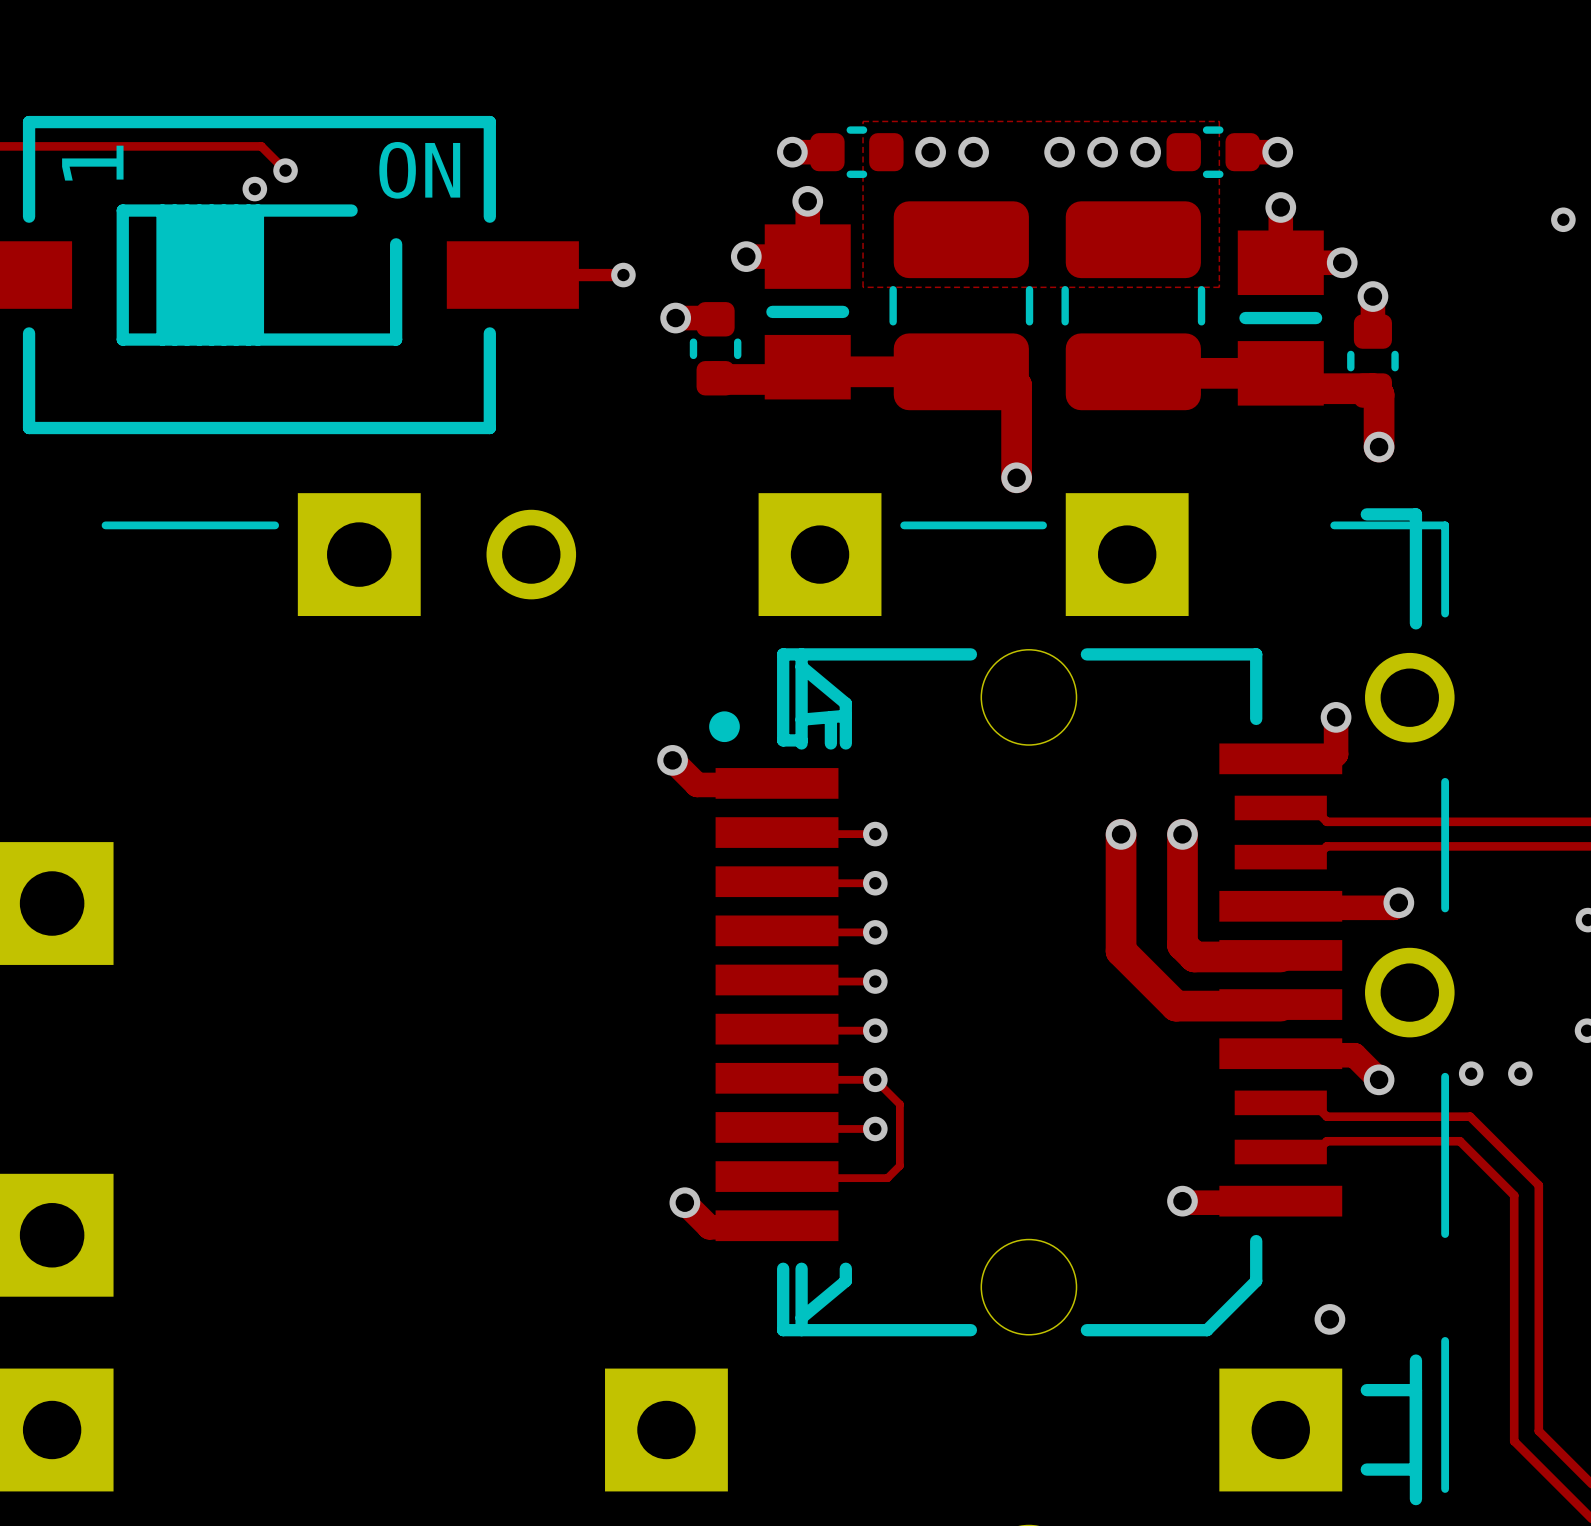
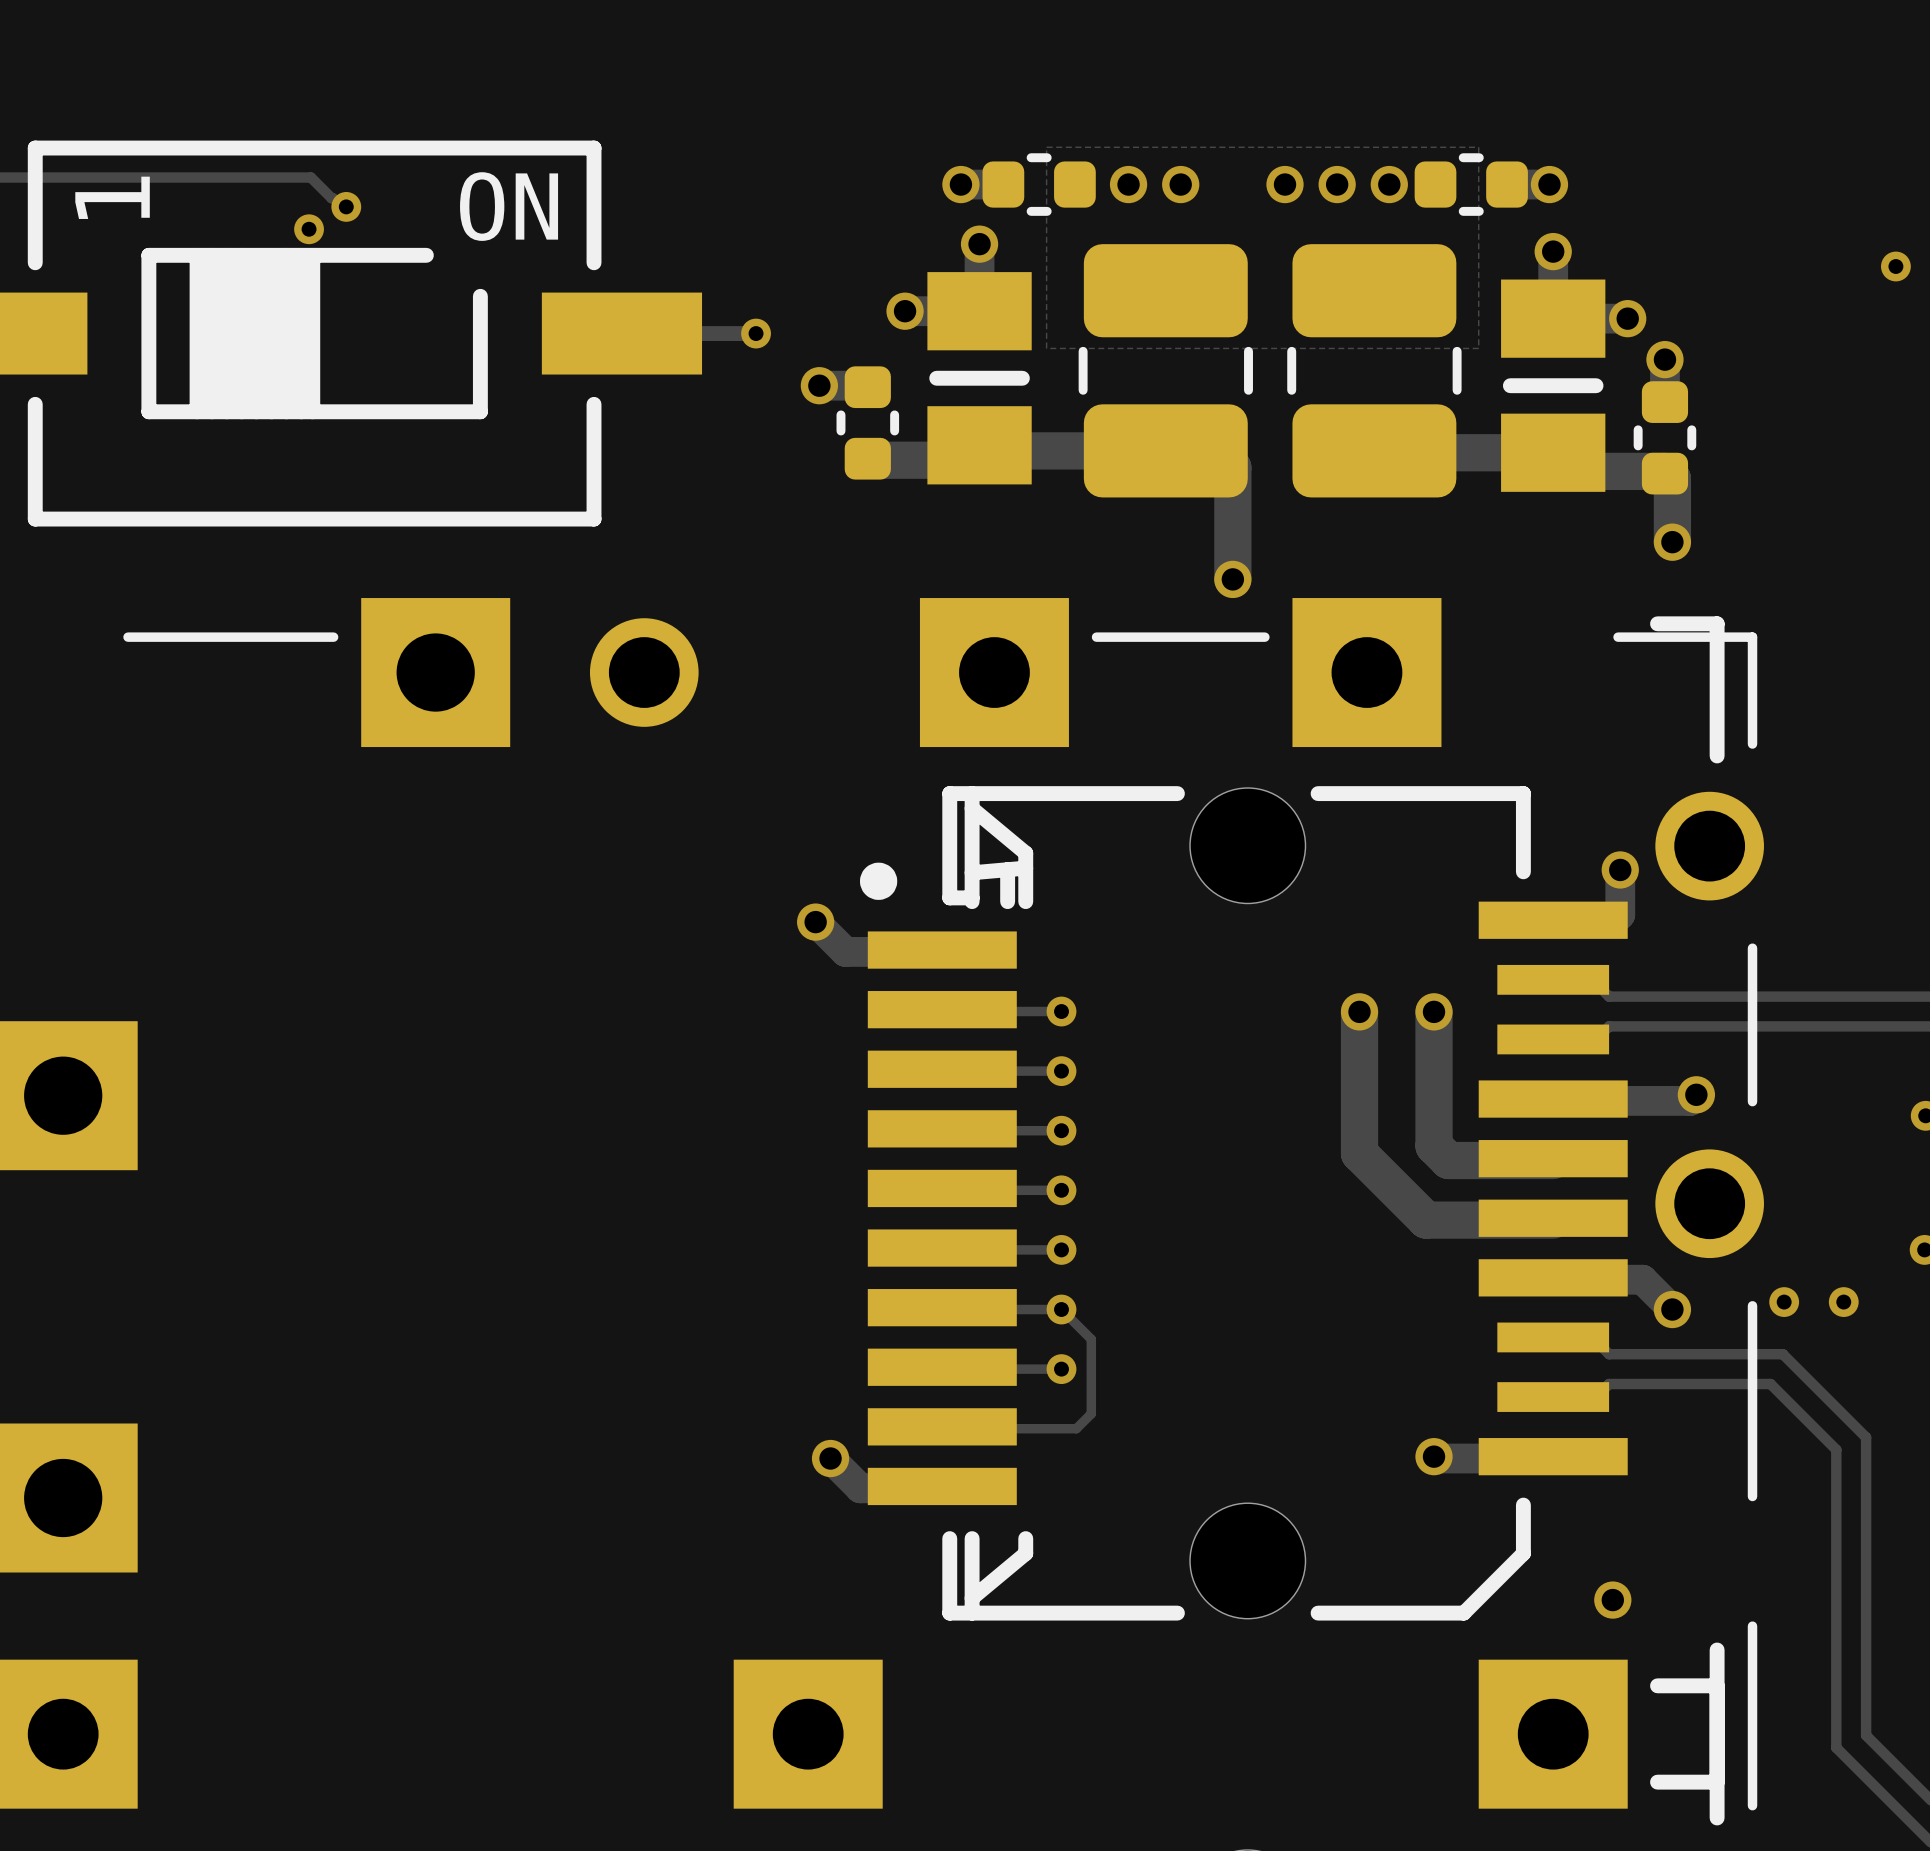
track: (256, 146) (261, 146) (285, 170) -> (310, 177) (331, 198)

